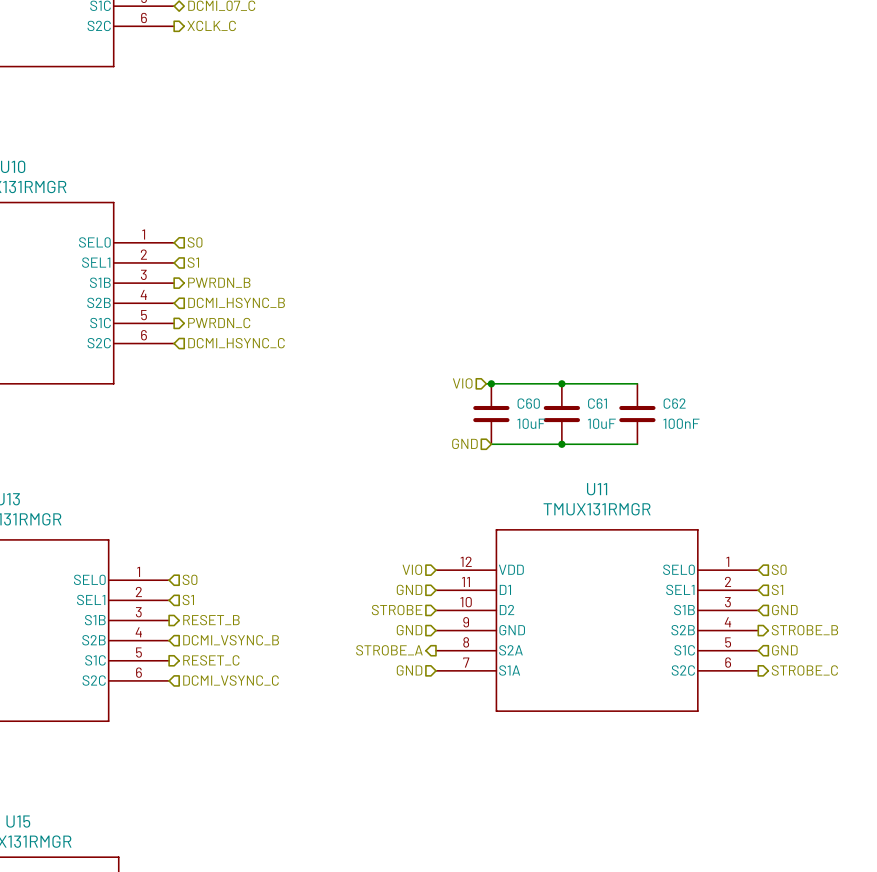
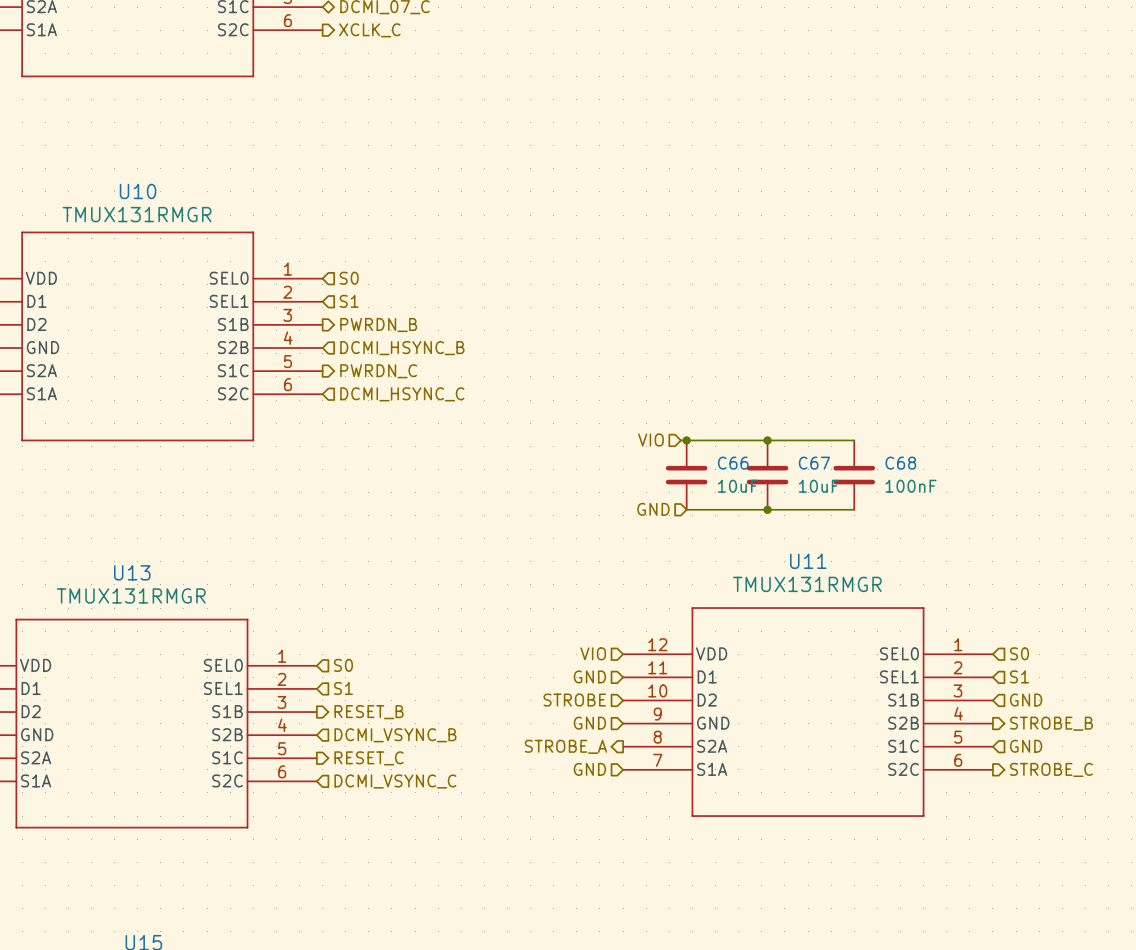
C60 name: C60 (528, 403) -> C66 (733, 463)
C61 name: C61 (597, 403) -> C67 (814, 463)
C62 name: C62 (674, 403) -> C68 (900, 463)

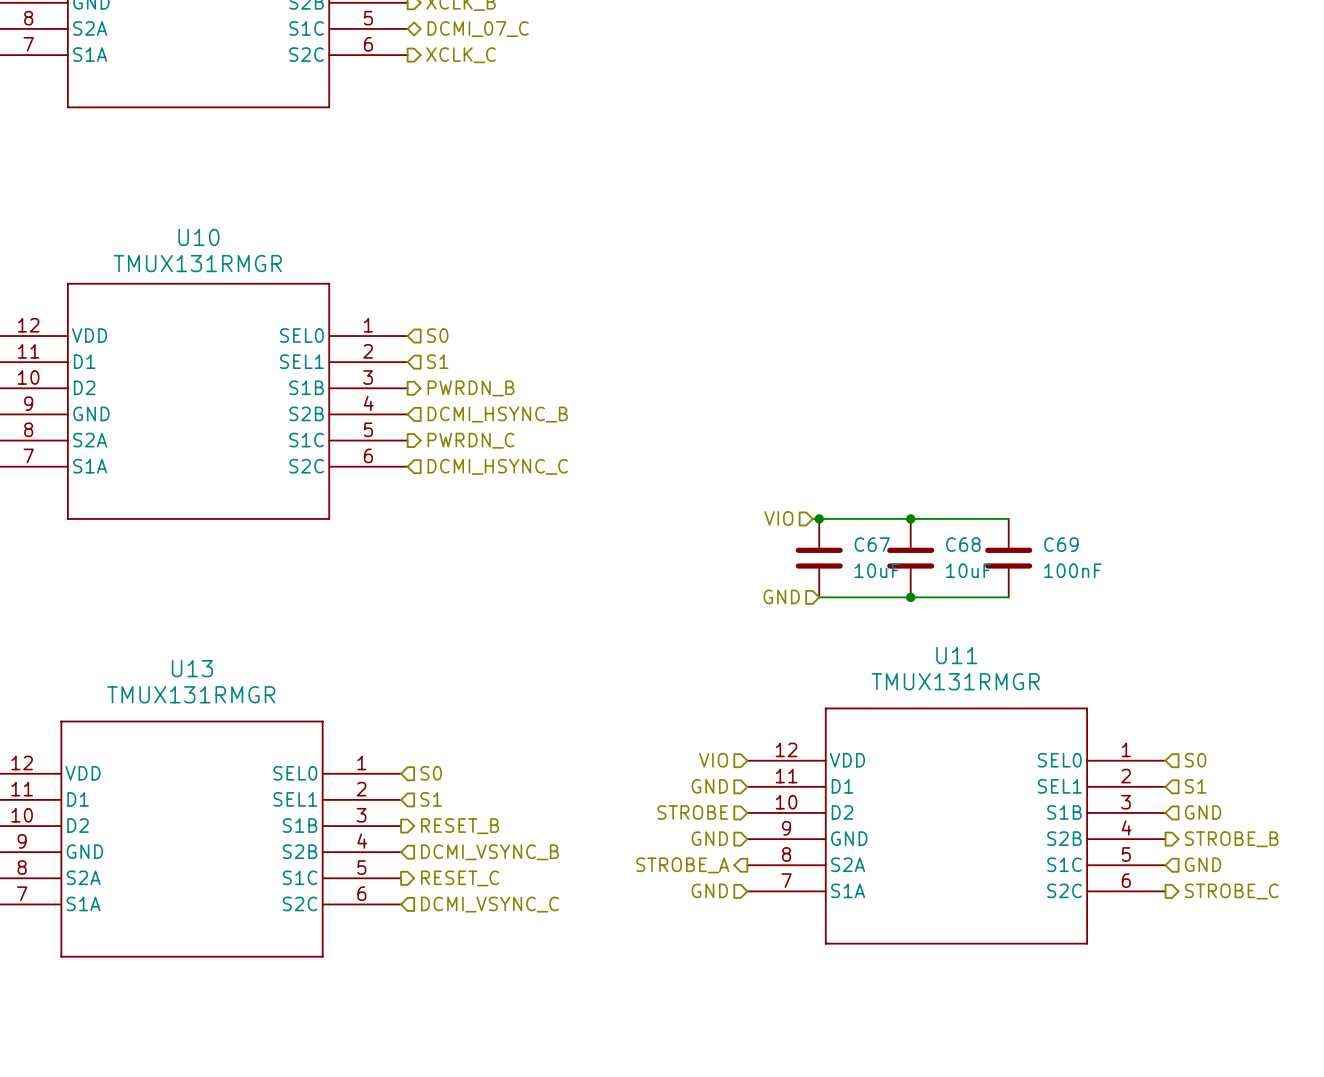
C66 name: C66 (733, 463) -> C67 (872, 544)
C67 name: C67 (814, 463) -> C68 (963, 544)
C68 name: C68 (900, 463) -> C69 (1061, 544)

